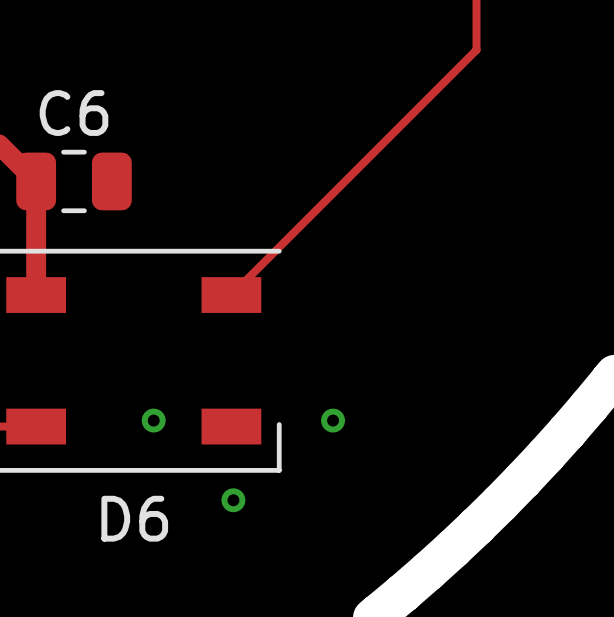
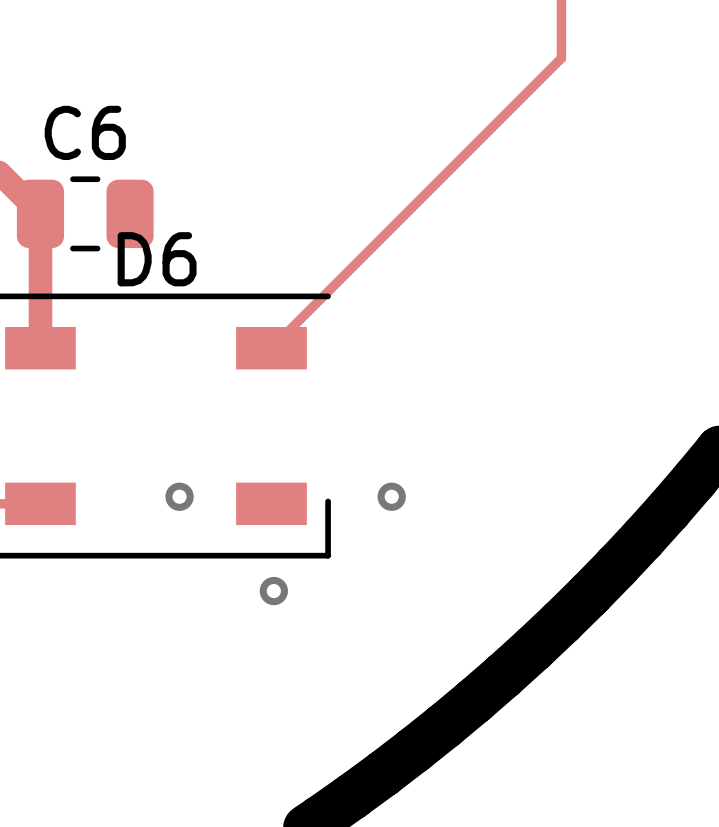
D6 name position: D6 (134, 518) -> D6 (157, 259)

